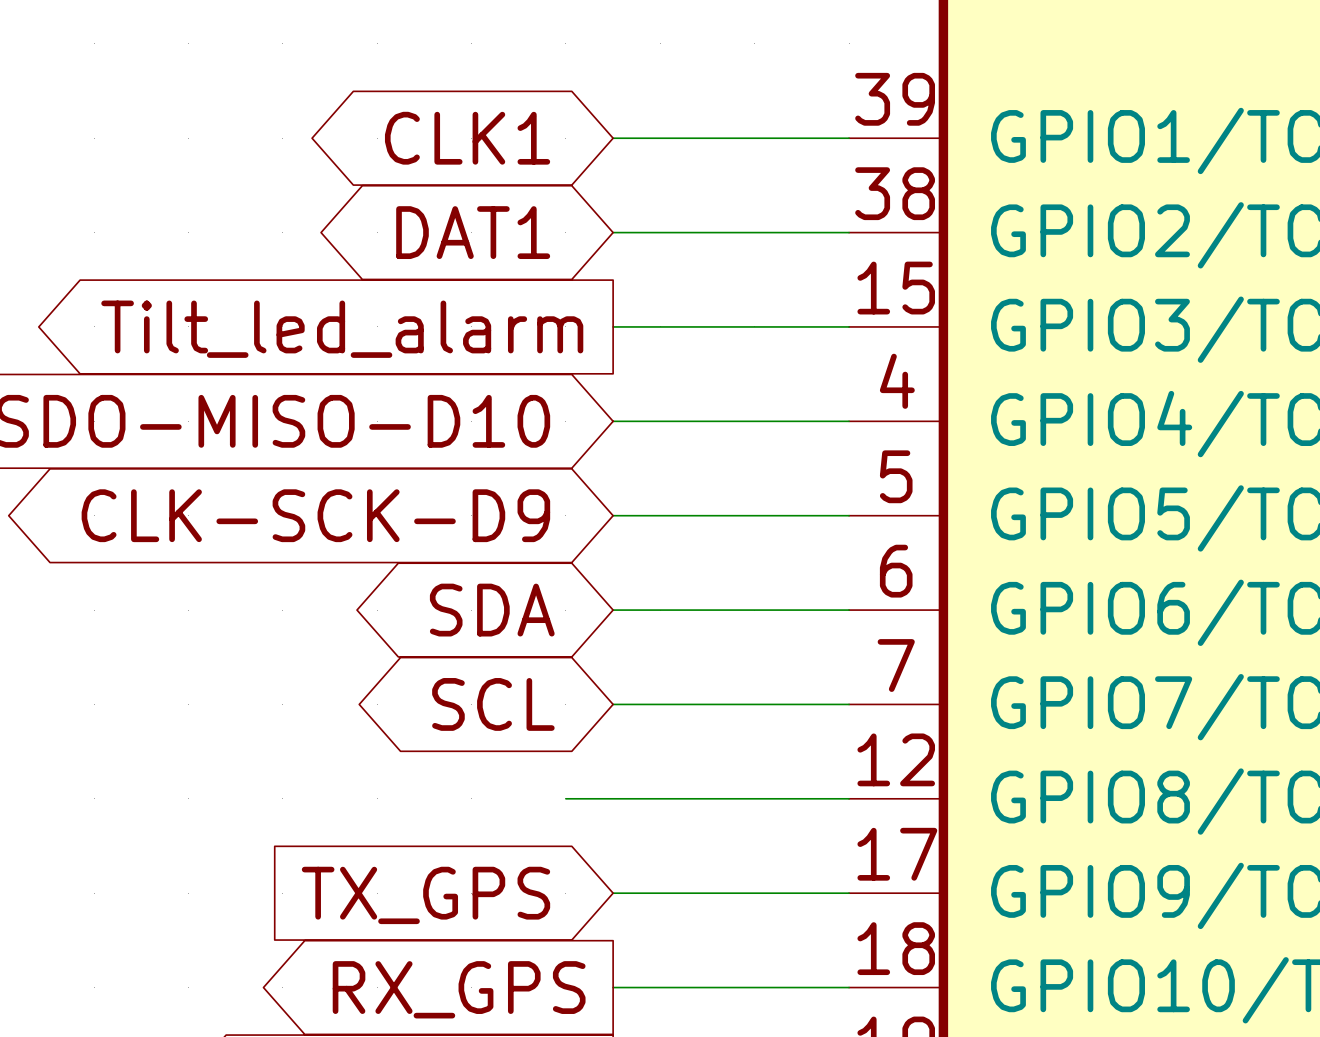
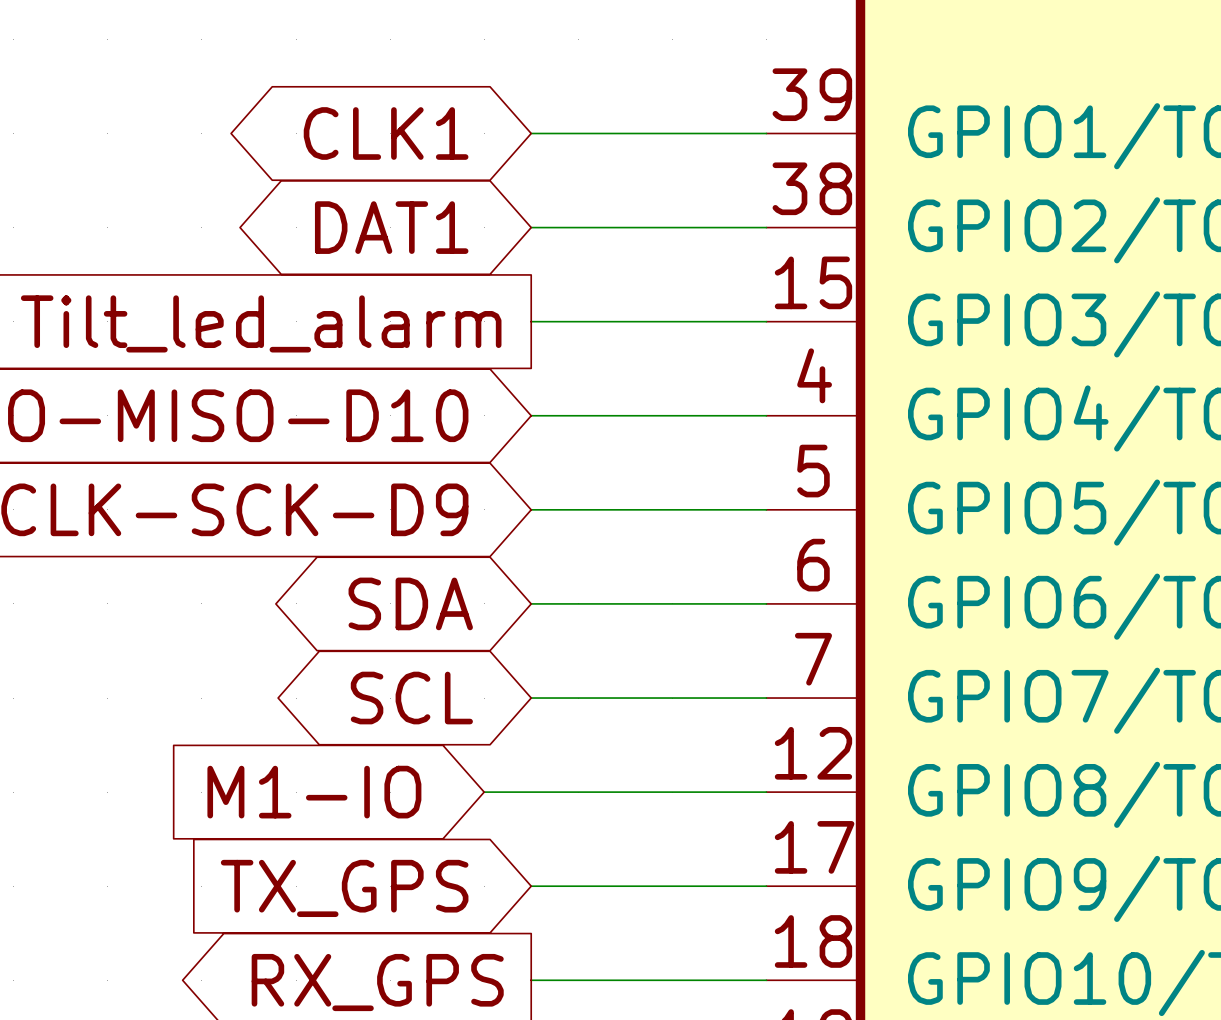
global label: none -> M1-IO (314, 792)

